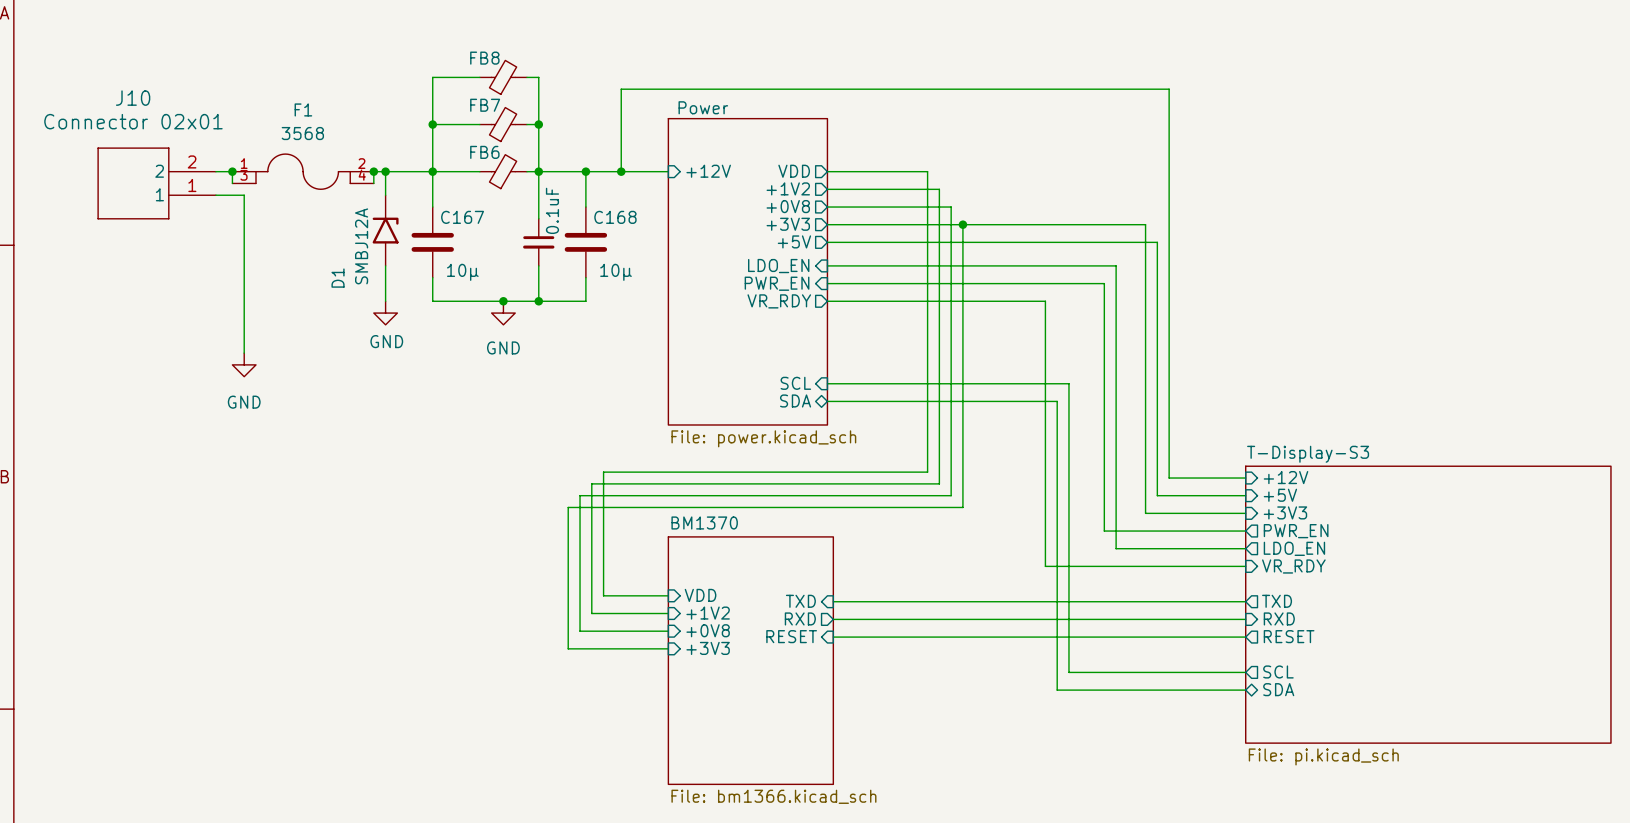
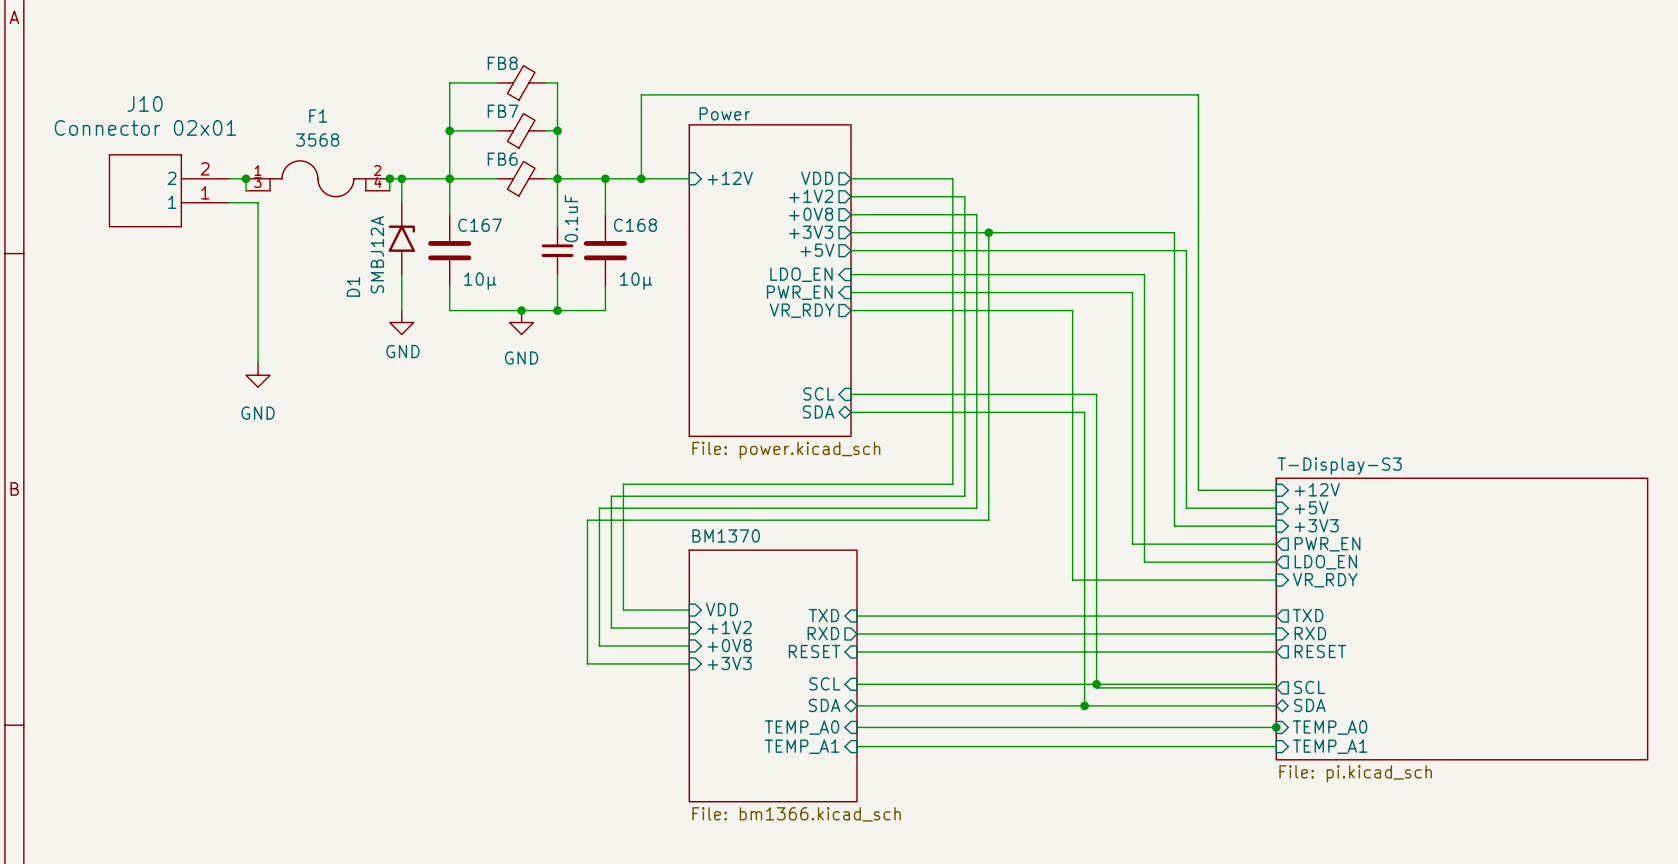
sheet pin: none -> SCL (824, 683)
wire: none -> (857, 684) (1276, 684)
junction: none -> (1096, 684)
sheet pin: none -> SDA (824, 705)
wire: none -> (857, 705) (1084, 705)
junction: none -> (1084, 705)
sheet pin: none -> TEMP_A0 (802, 727)
wire: none -> (857, 727) (1278, 727)
junction: none -> (1276, 727)
sheet pin: none -> TEMP_A0 (1330, 727)
sheet pin: none -> TEMP_A1 (802, 746)
wire: none -> (857, 746) (1276, 746)
sheet pin: none -> TEMP_A1 (1330, 746)

